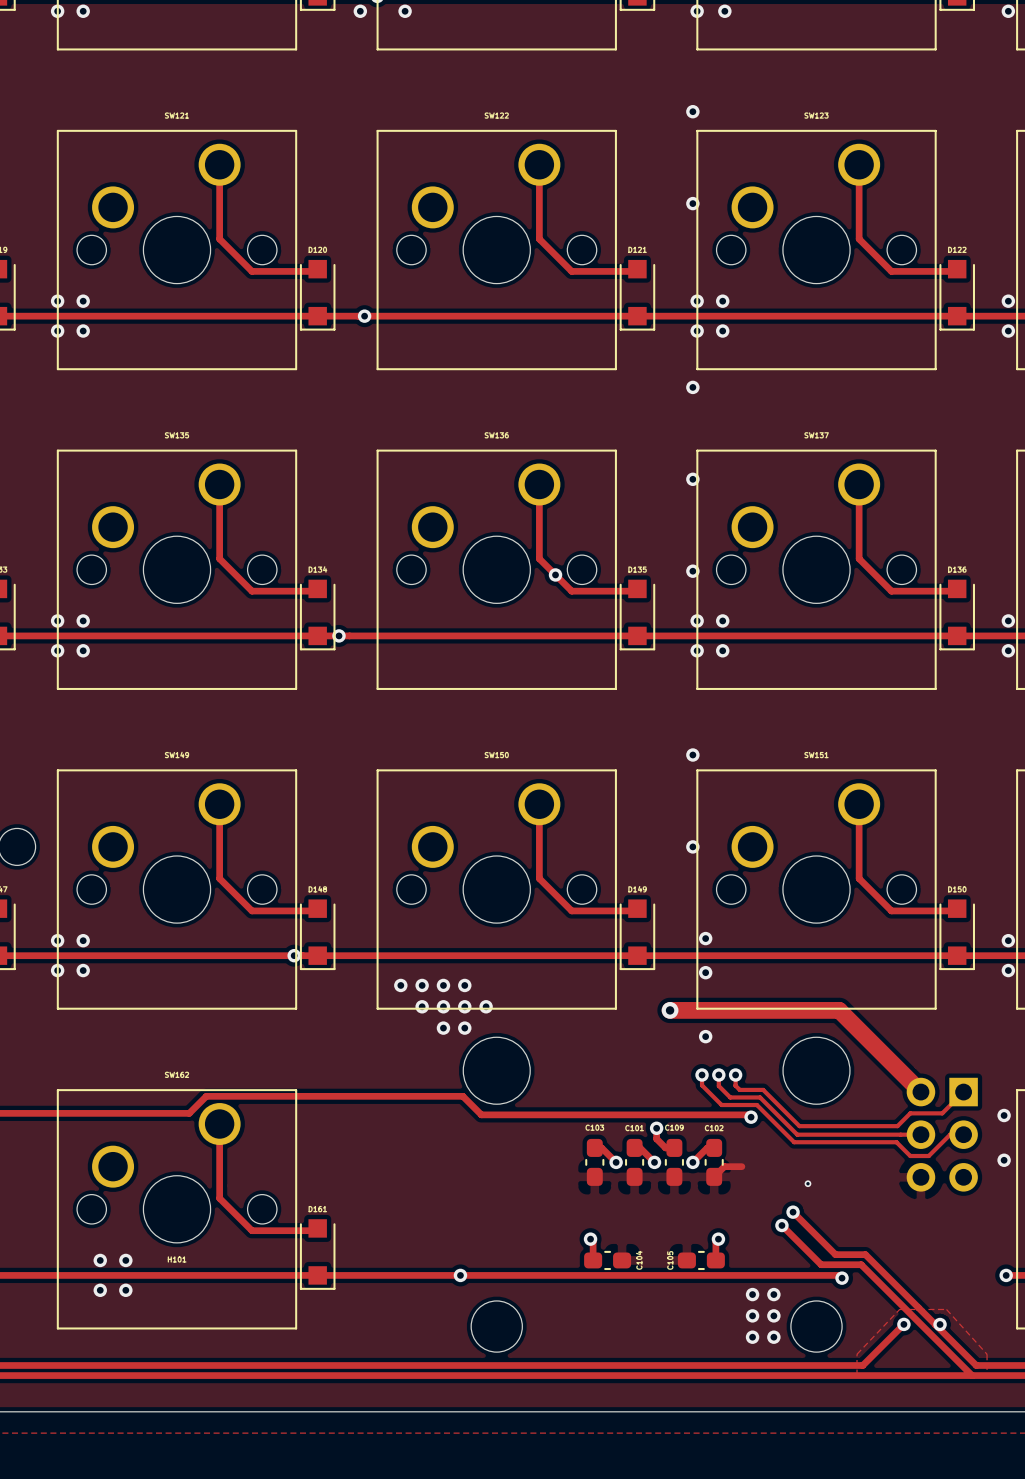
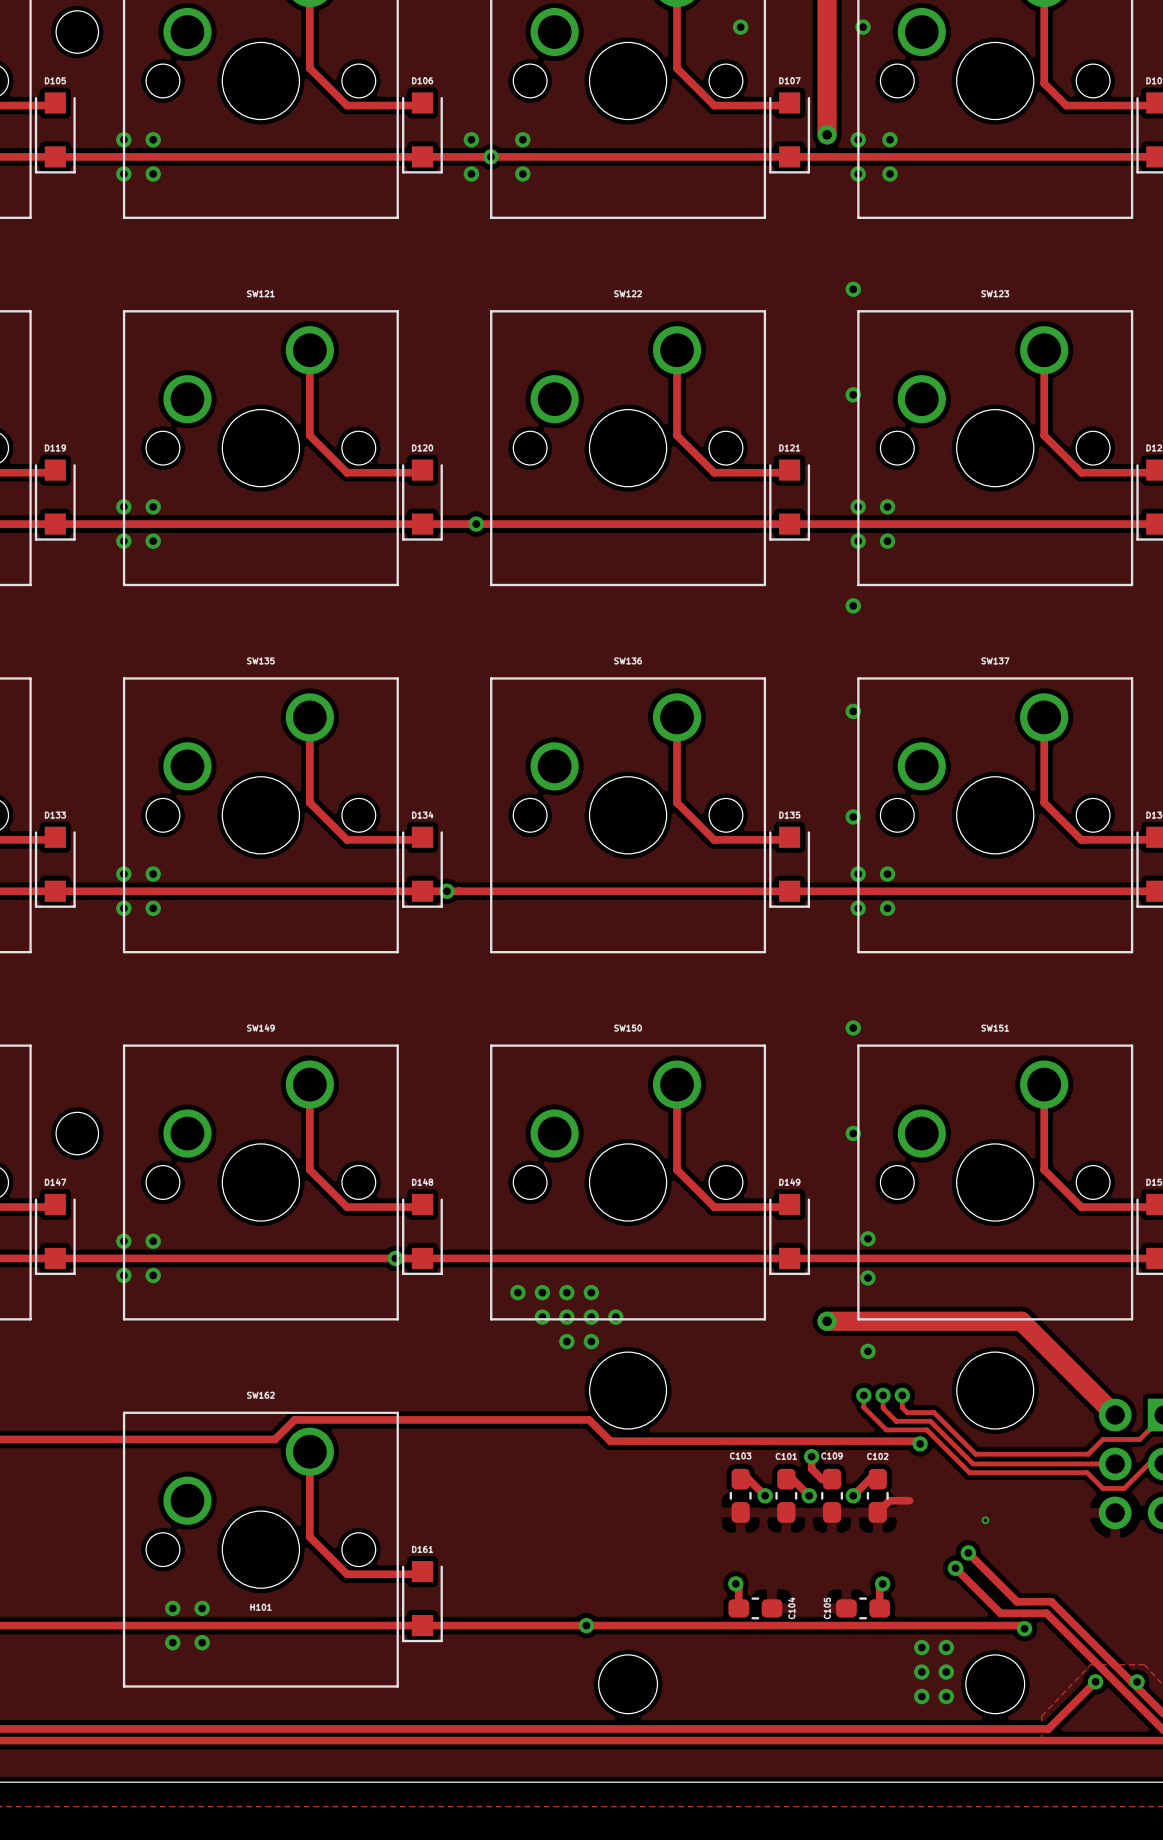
via: (555, 574) -> none

